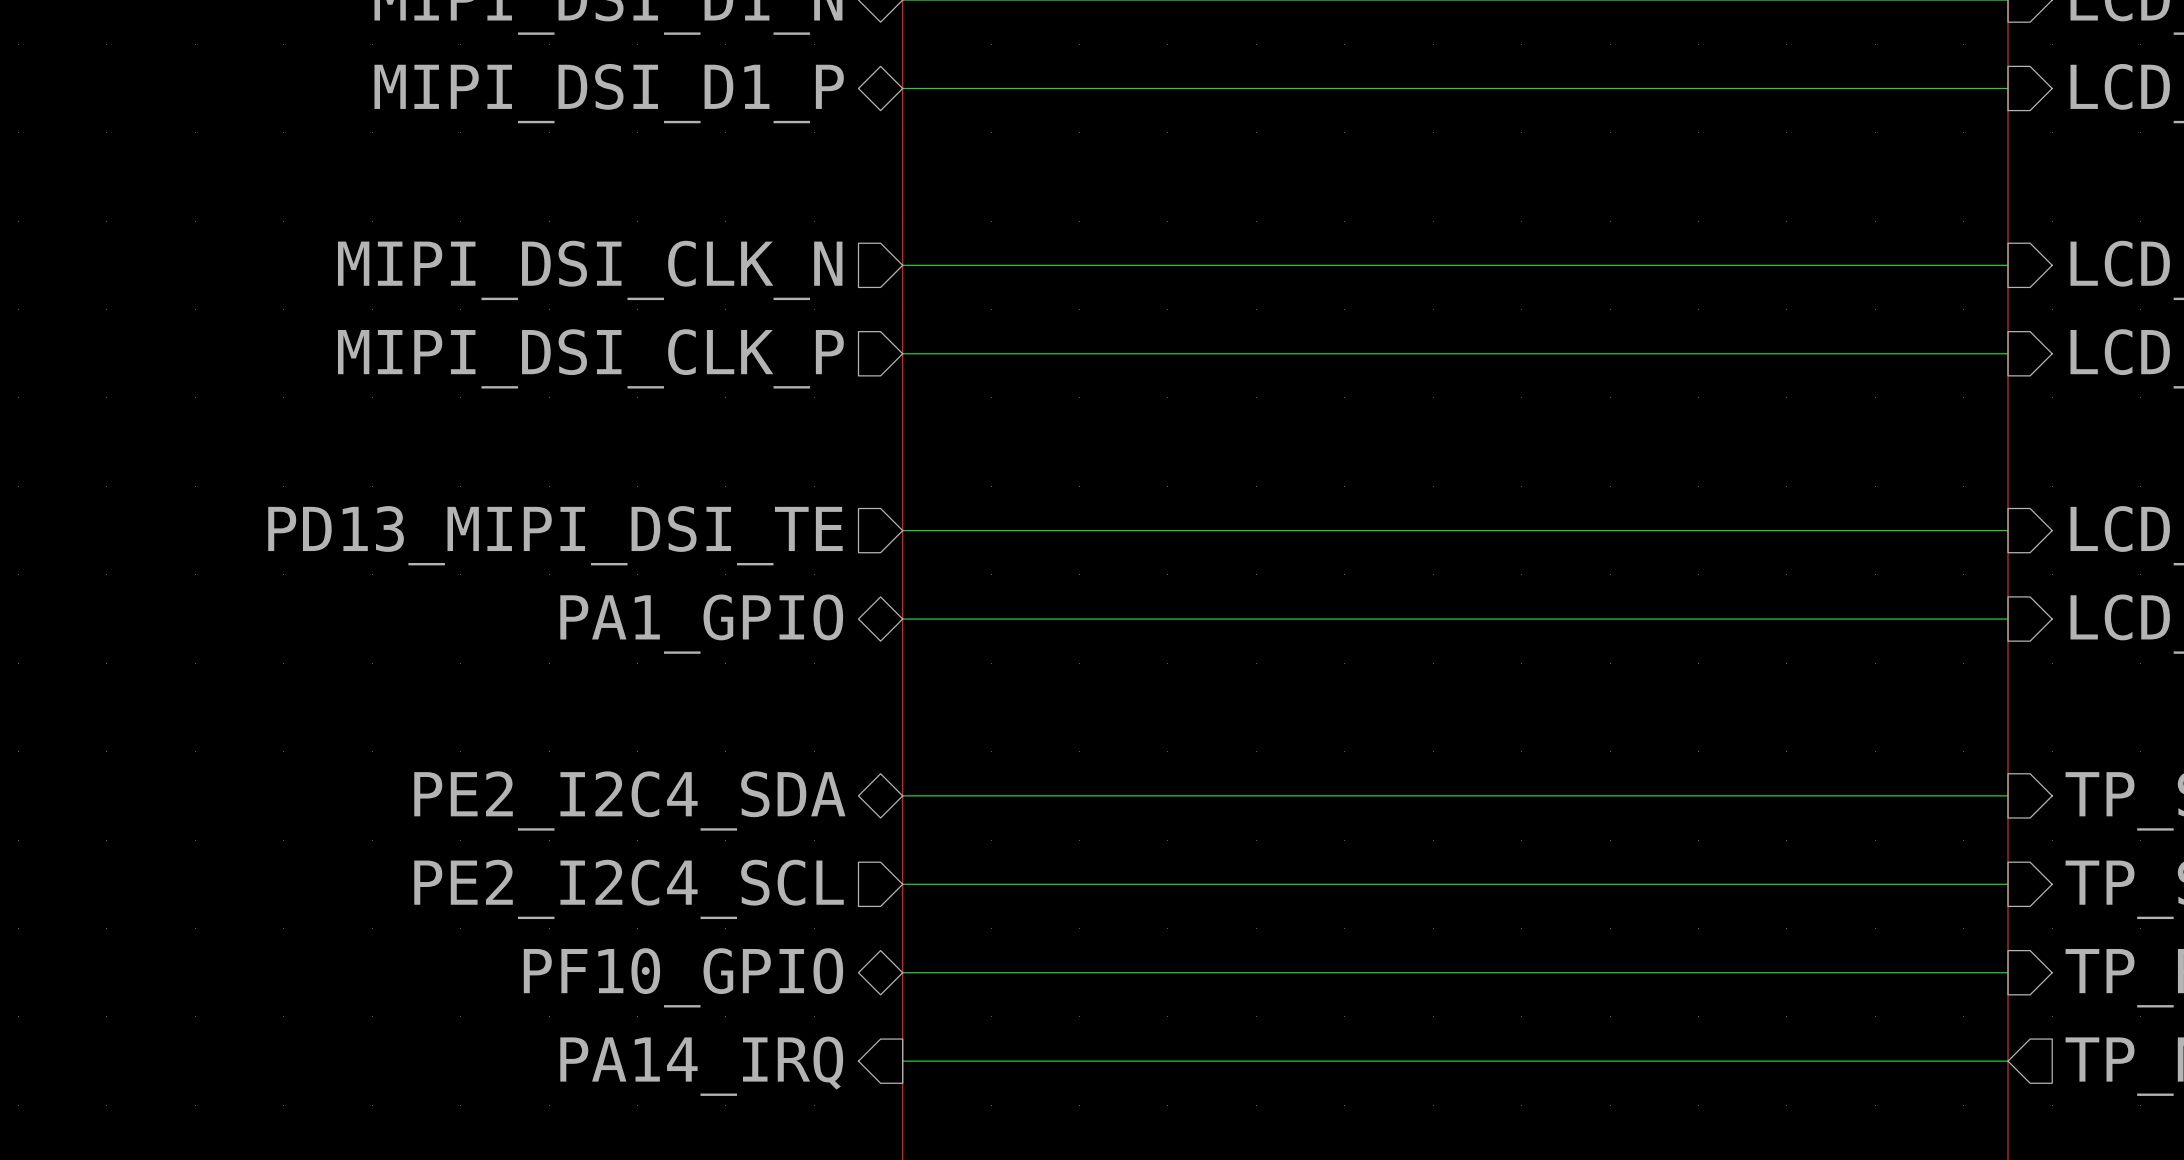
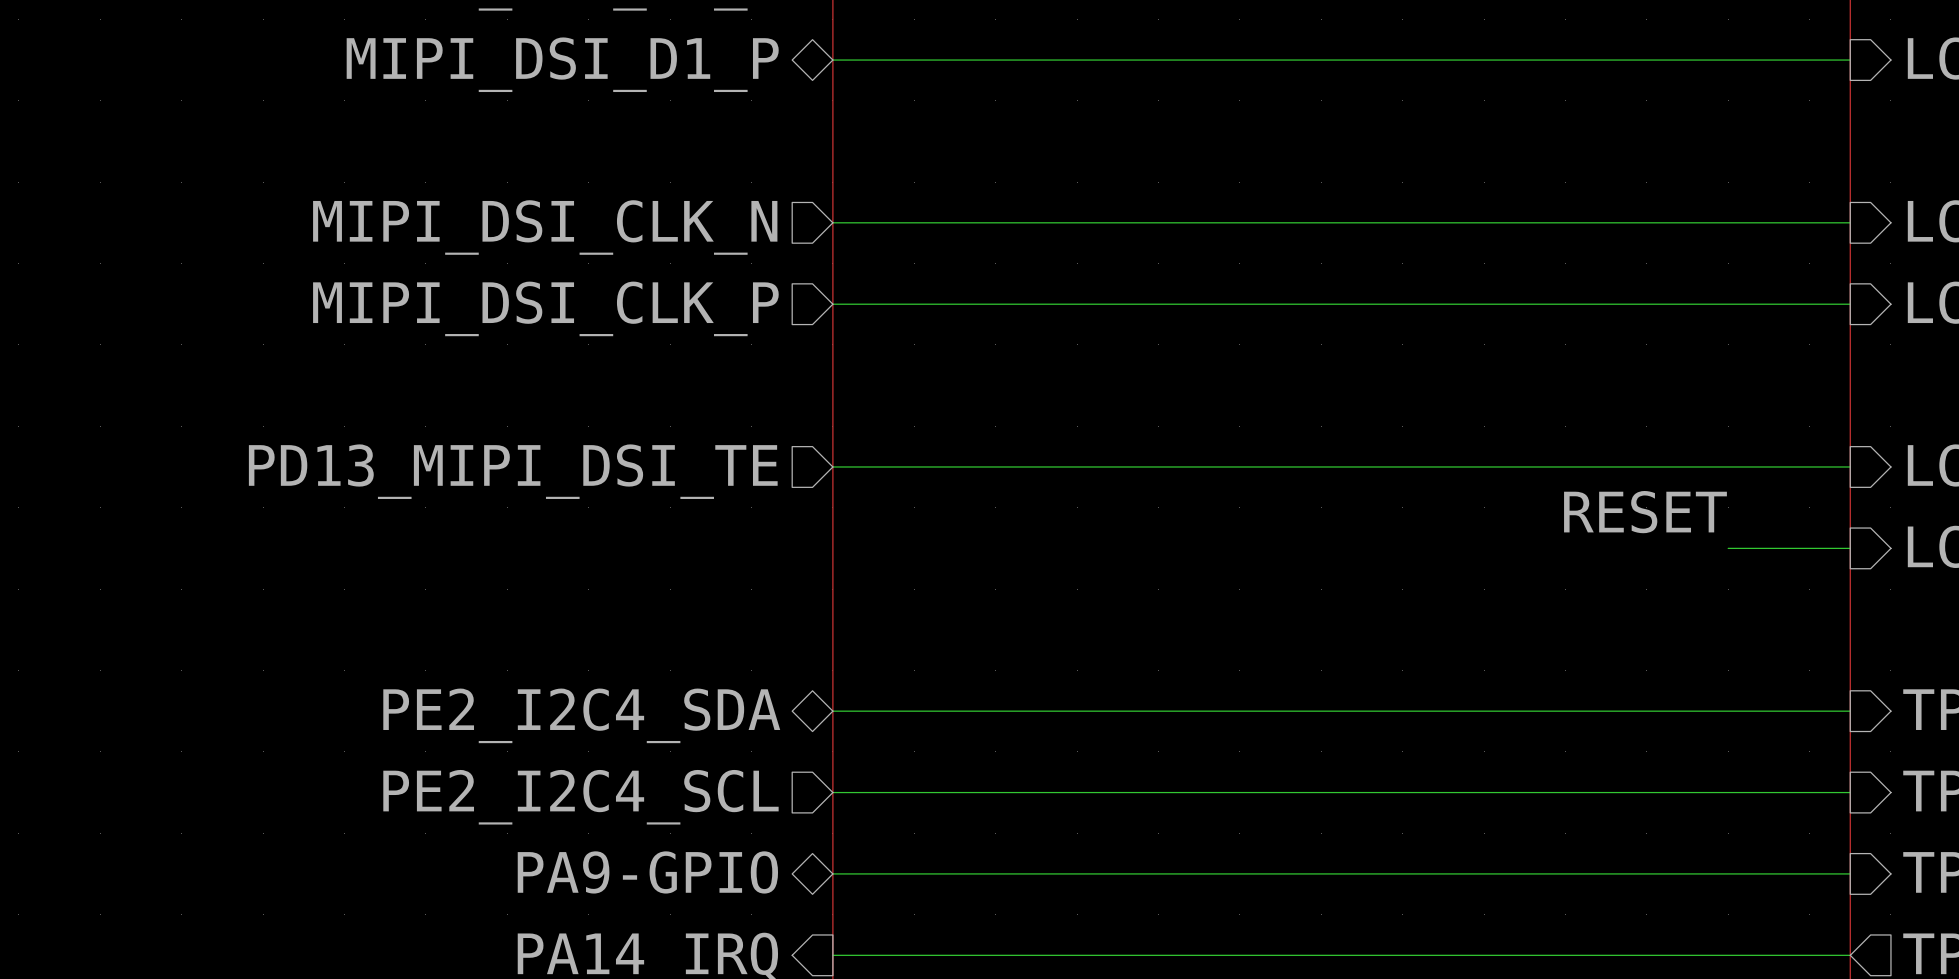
label: none -> RESET (1645, 512)
wire: (902, 619) (1875, 619) -> none
sheet pin: PA1_GPIO (701, 624) -> none
sheet pin: PF10_GPIO (683, 977) -> PA9-GPIO (647, 872)

